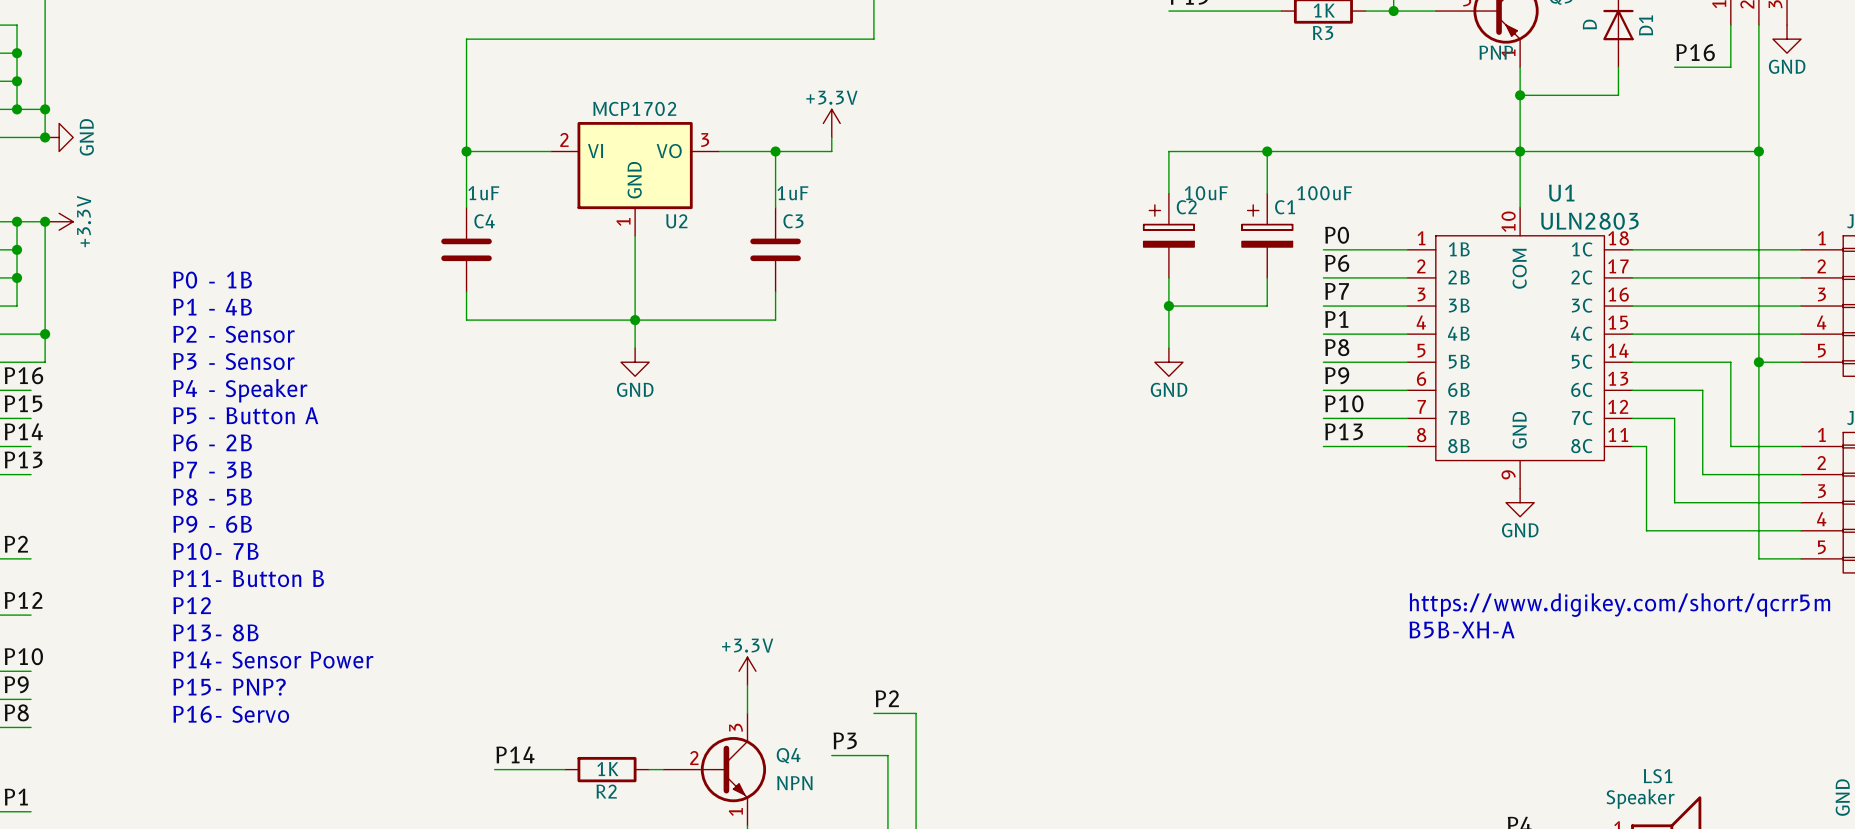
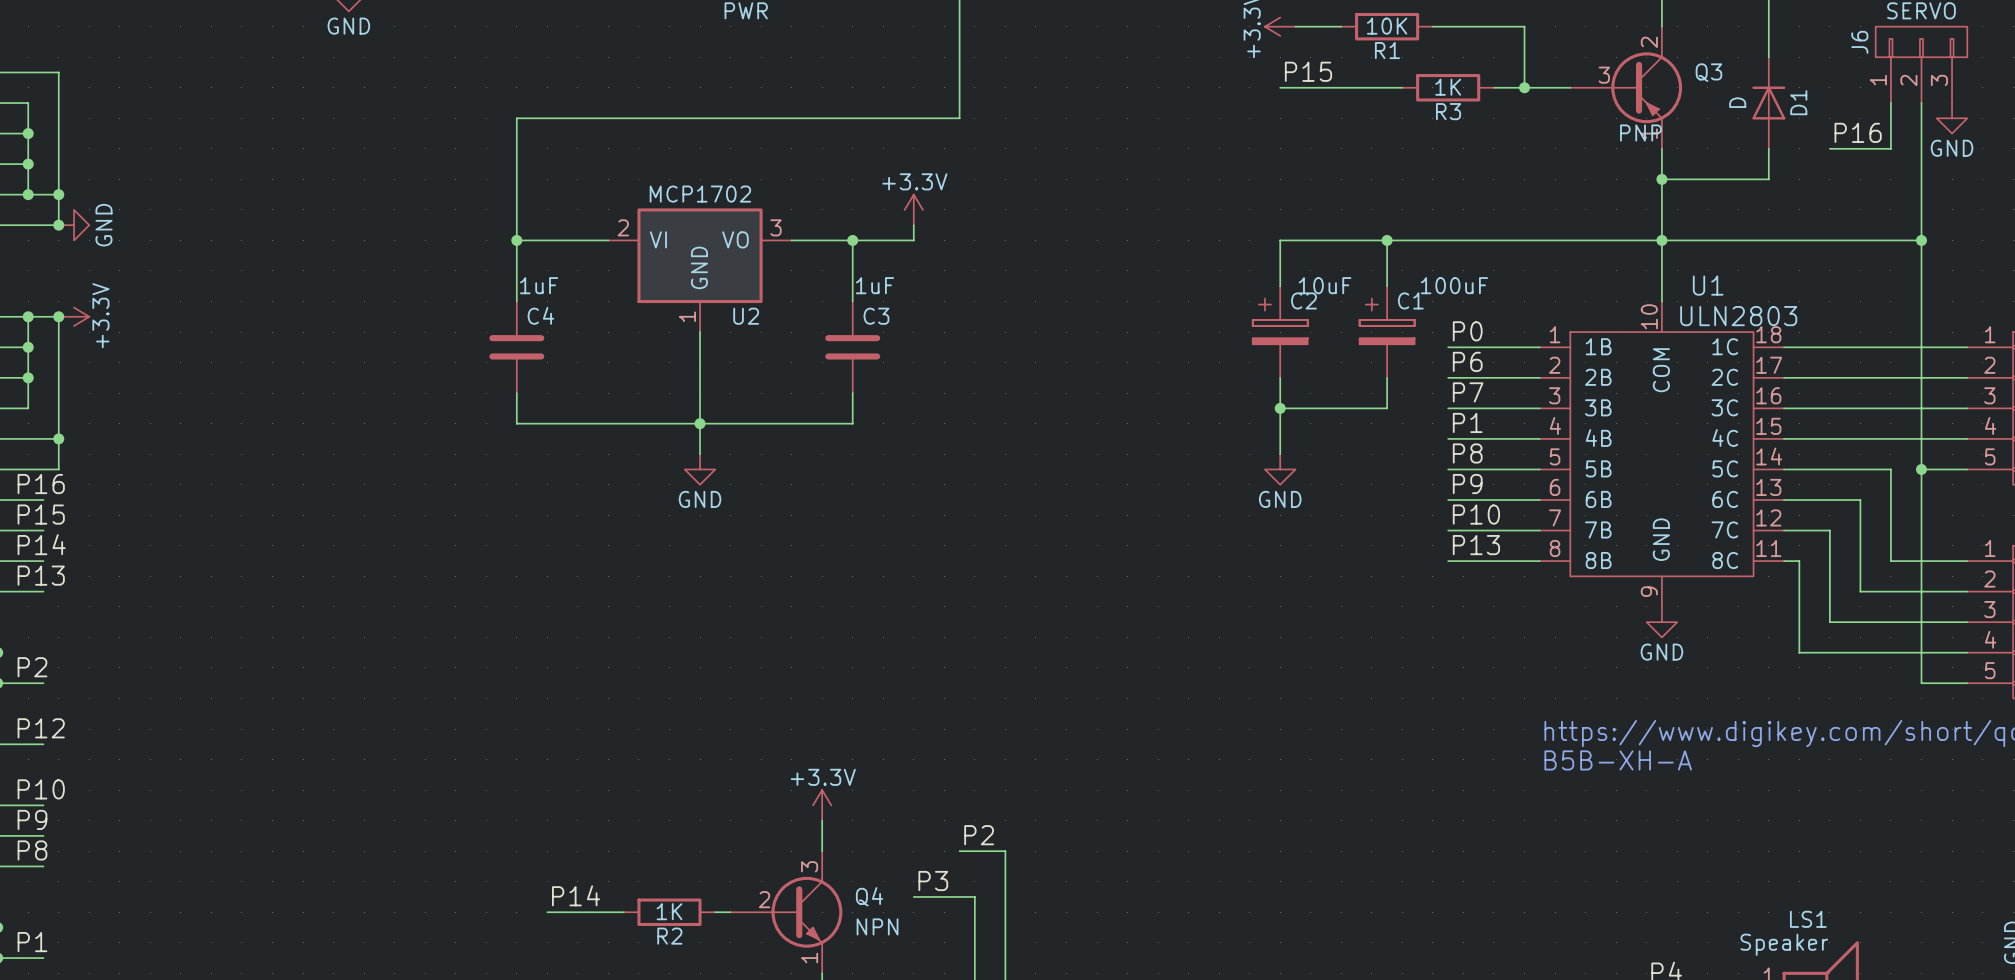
text: P0 - 1B (212, 280) -> none
text: P1 - 4B (212, 307) -> none
text: P2 - Sensor (233, 334) -> none
text: P3 - Sensor (233, 361) -> none
text: P4 - Speaker (240, 390) -> none
text: P5 - Button A (245, 415) -> none
text: P6 - 2B (212, 442) -> none
text: P7 - 3B (212, 469) -> none
text: P8 - 5B (212, 497) -> none
text: P9 - 6B (212, 524) -> none
text: P10- 7B (215, 551) -> none
text: P11- Button B (248, 578) -> none
text: P12 (192, 605) -> none
text: P13- 8B (215, 632) -> none
text: P14- Sensor Power (273, 660) -> none
text: P15- PNP? (229, 687) -> none
text: P16- Servo (231, 714) -> none

